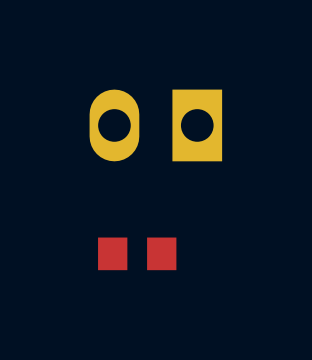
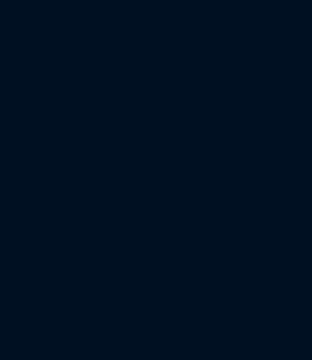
part: (155, 125) -> none
part: (137, 253) -> none

